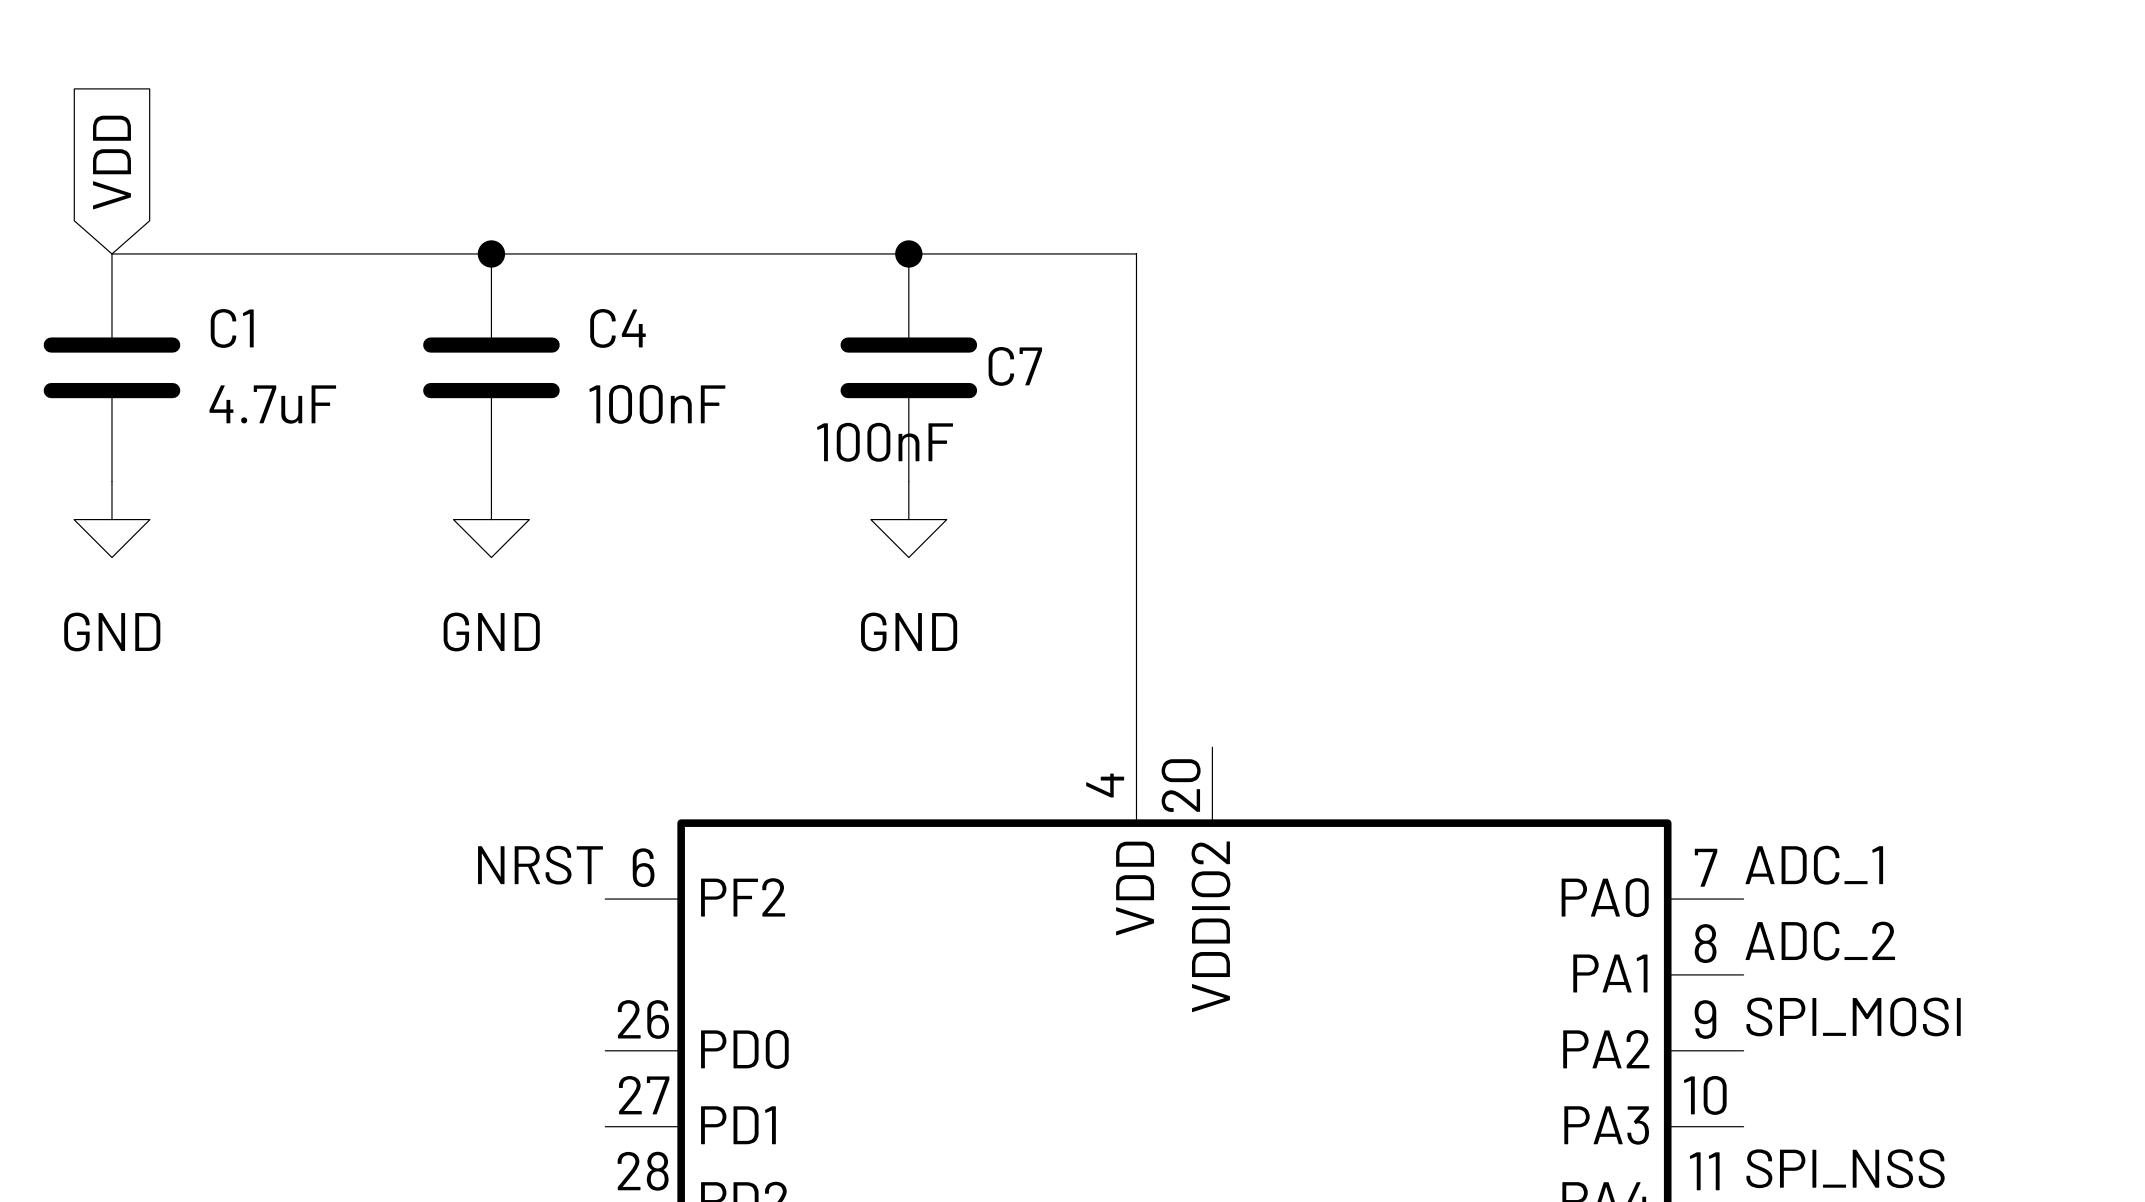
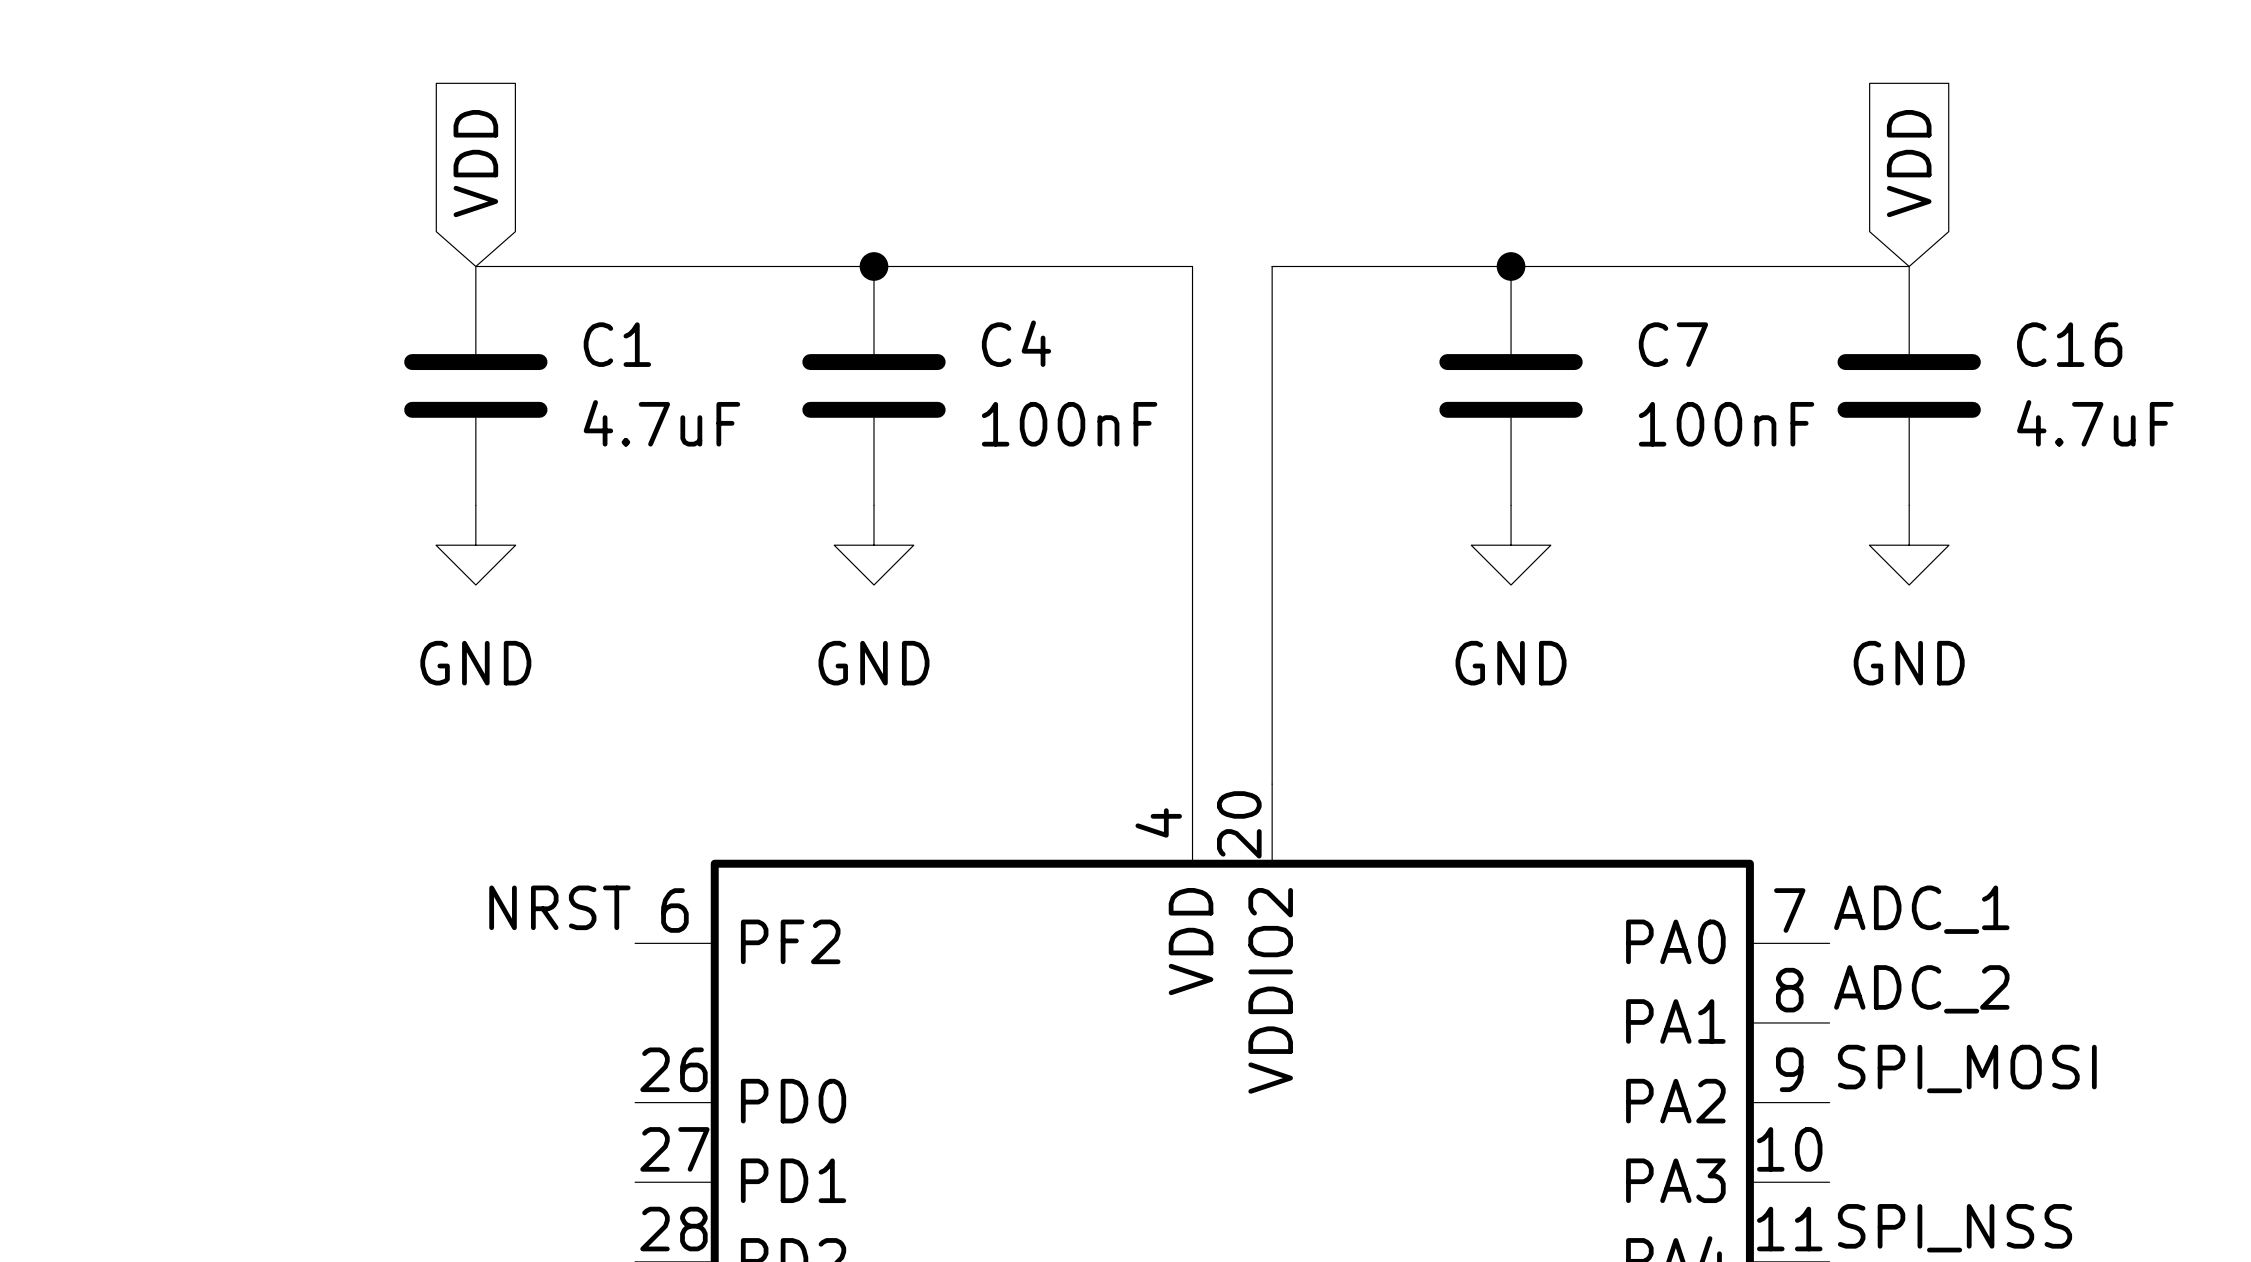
global label position: VDD (111, 162) -> VDD (475, 163)
global label: none -> VDD (1909, 163)
wire: (111, 253) (453, 253) -> none
junction: (491, 253) -> none
junction position: (908, 253) -> (873, 266)
junction: none -> (1511, 266)
wire: none -> (1909, 266) (1272, 266) (1272, 784)
C7 name position: C7 (1015, 366) -> C7 (1673, 344)
C1 position: (111, 367) -> (475, 385)
C4 position: (491, 367) -> (873, 385)
C7 position: (908, 367) -> (1511, 385)
C16: none -> 4.7uF (1909, 385)
C7 value position: 100nF (885, 442) -> 100nF (1726, 424)
power symbol: GND (111, 519) -> none
power symbol position: GND (491, 519) -> GND (475, 545)
power symbol position: GND (908, 519) -> GND (873, 545)
power symbol: none -> GND (1511, 545)
power symbol: none -> GND (1909, 545)

